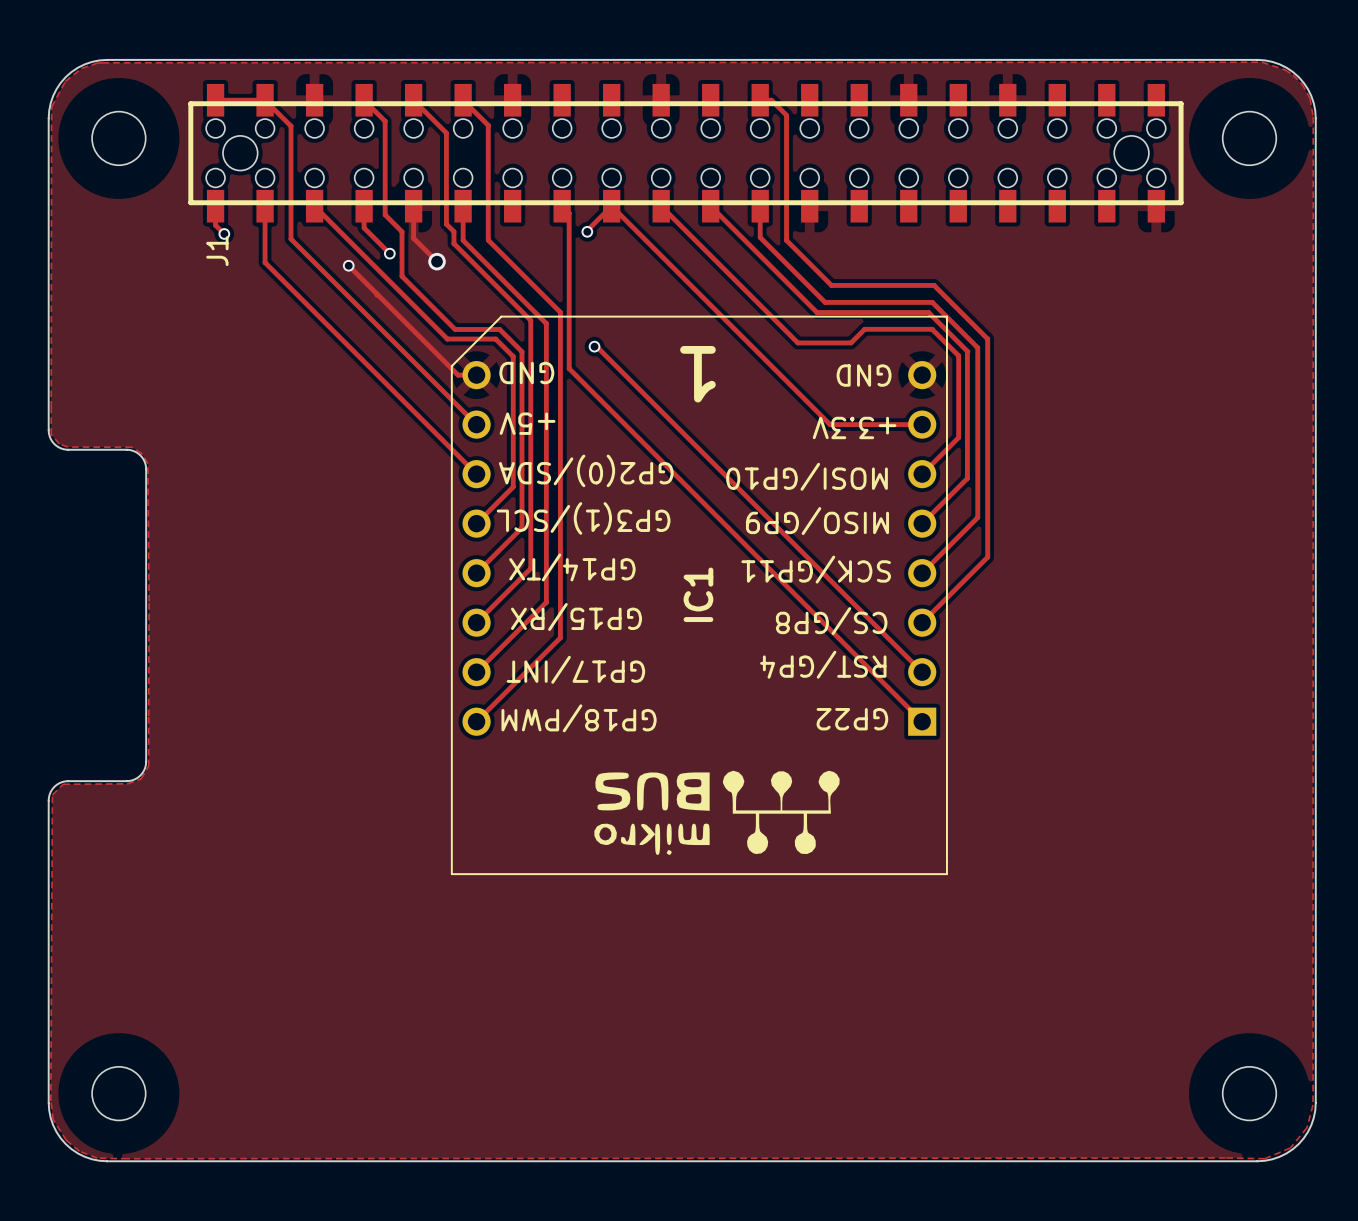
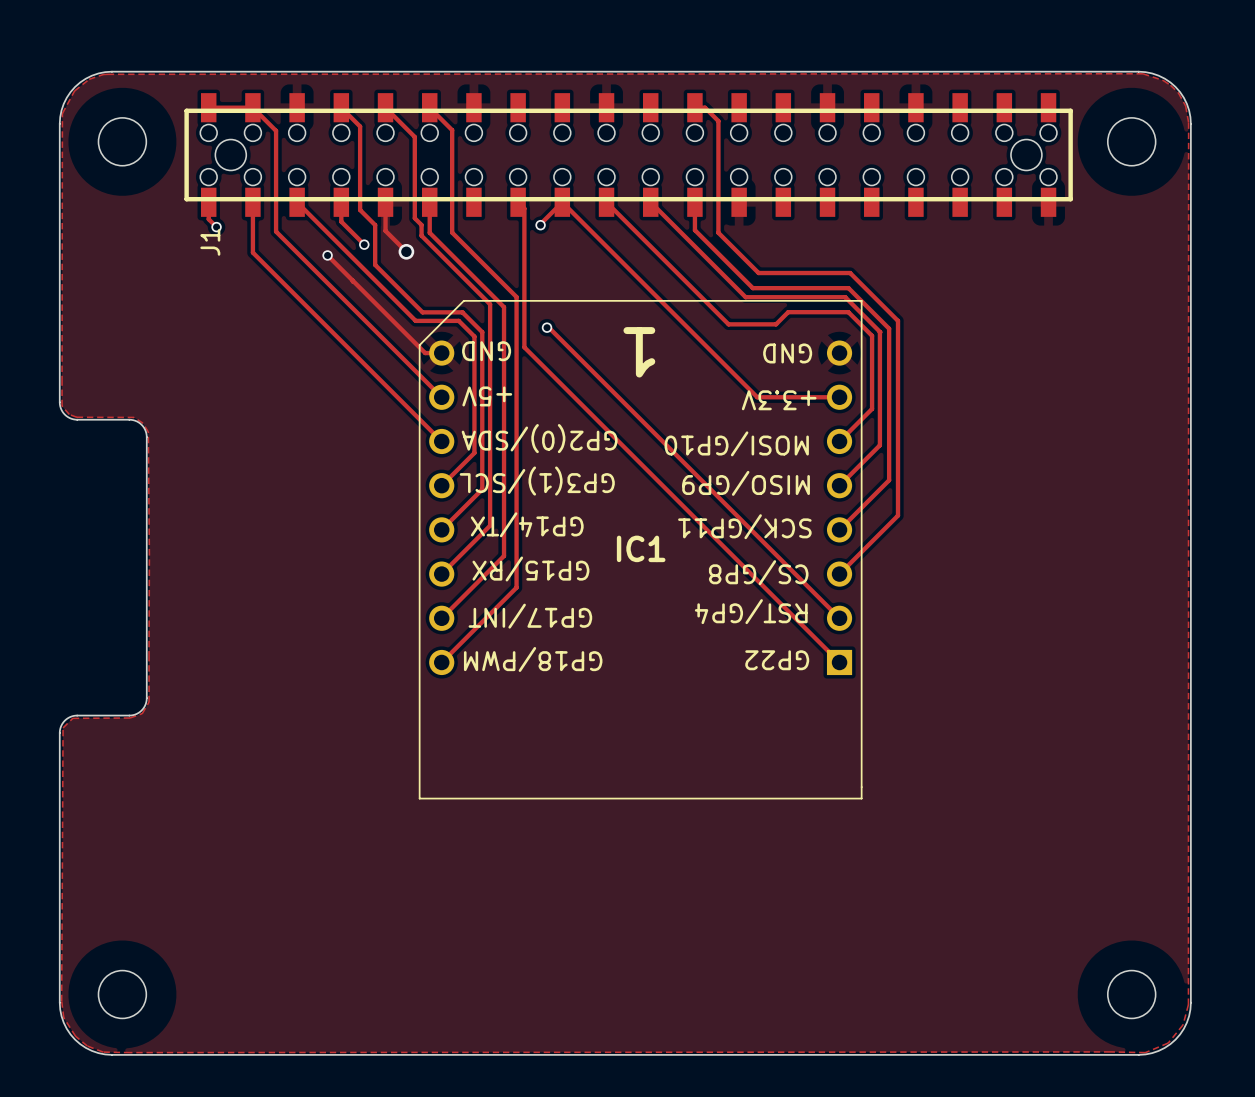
IC1 name rotation: 0° (698, 594) -> 90° clockwise (641, 548)
drawing: [594, 770, 840, 855] -> none

